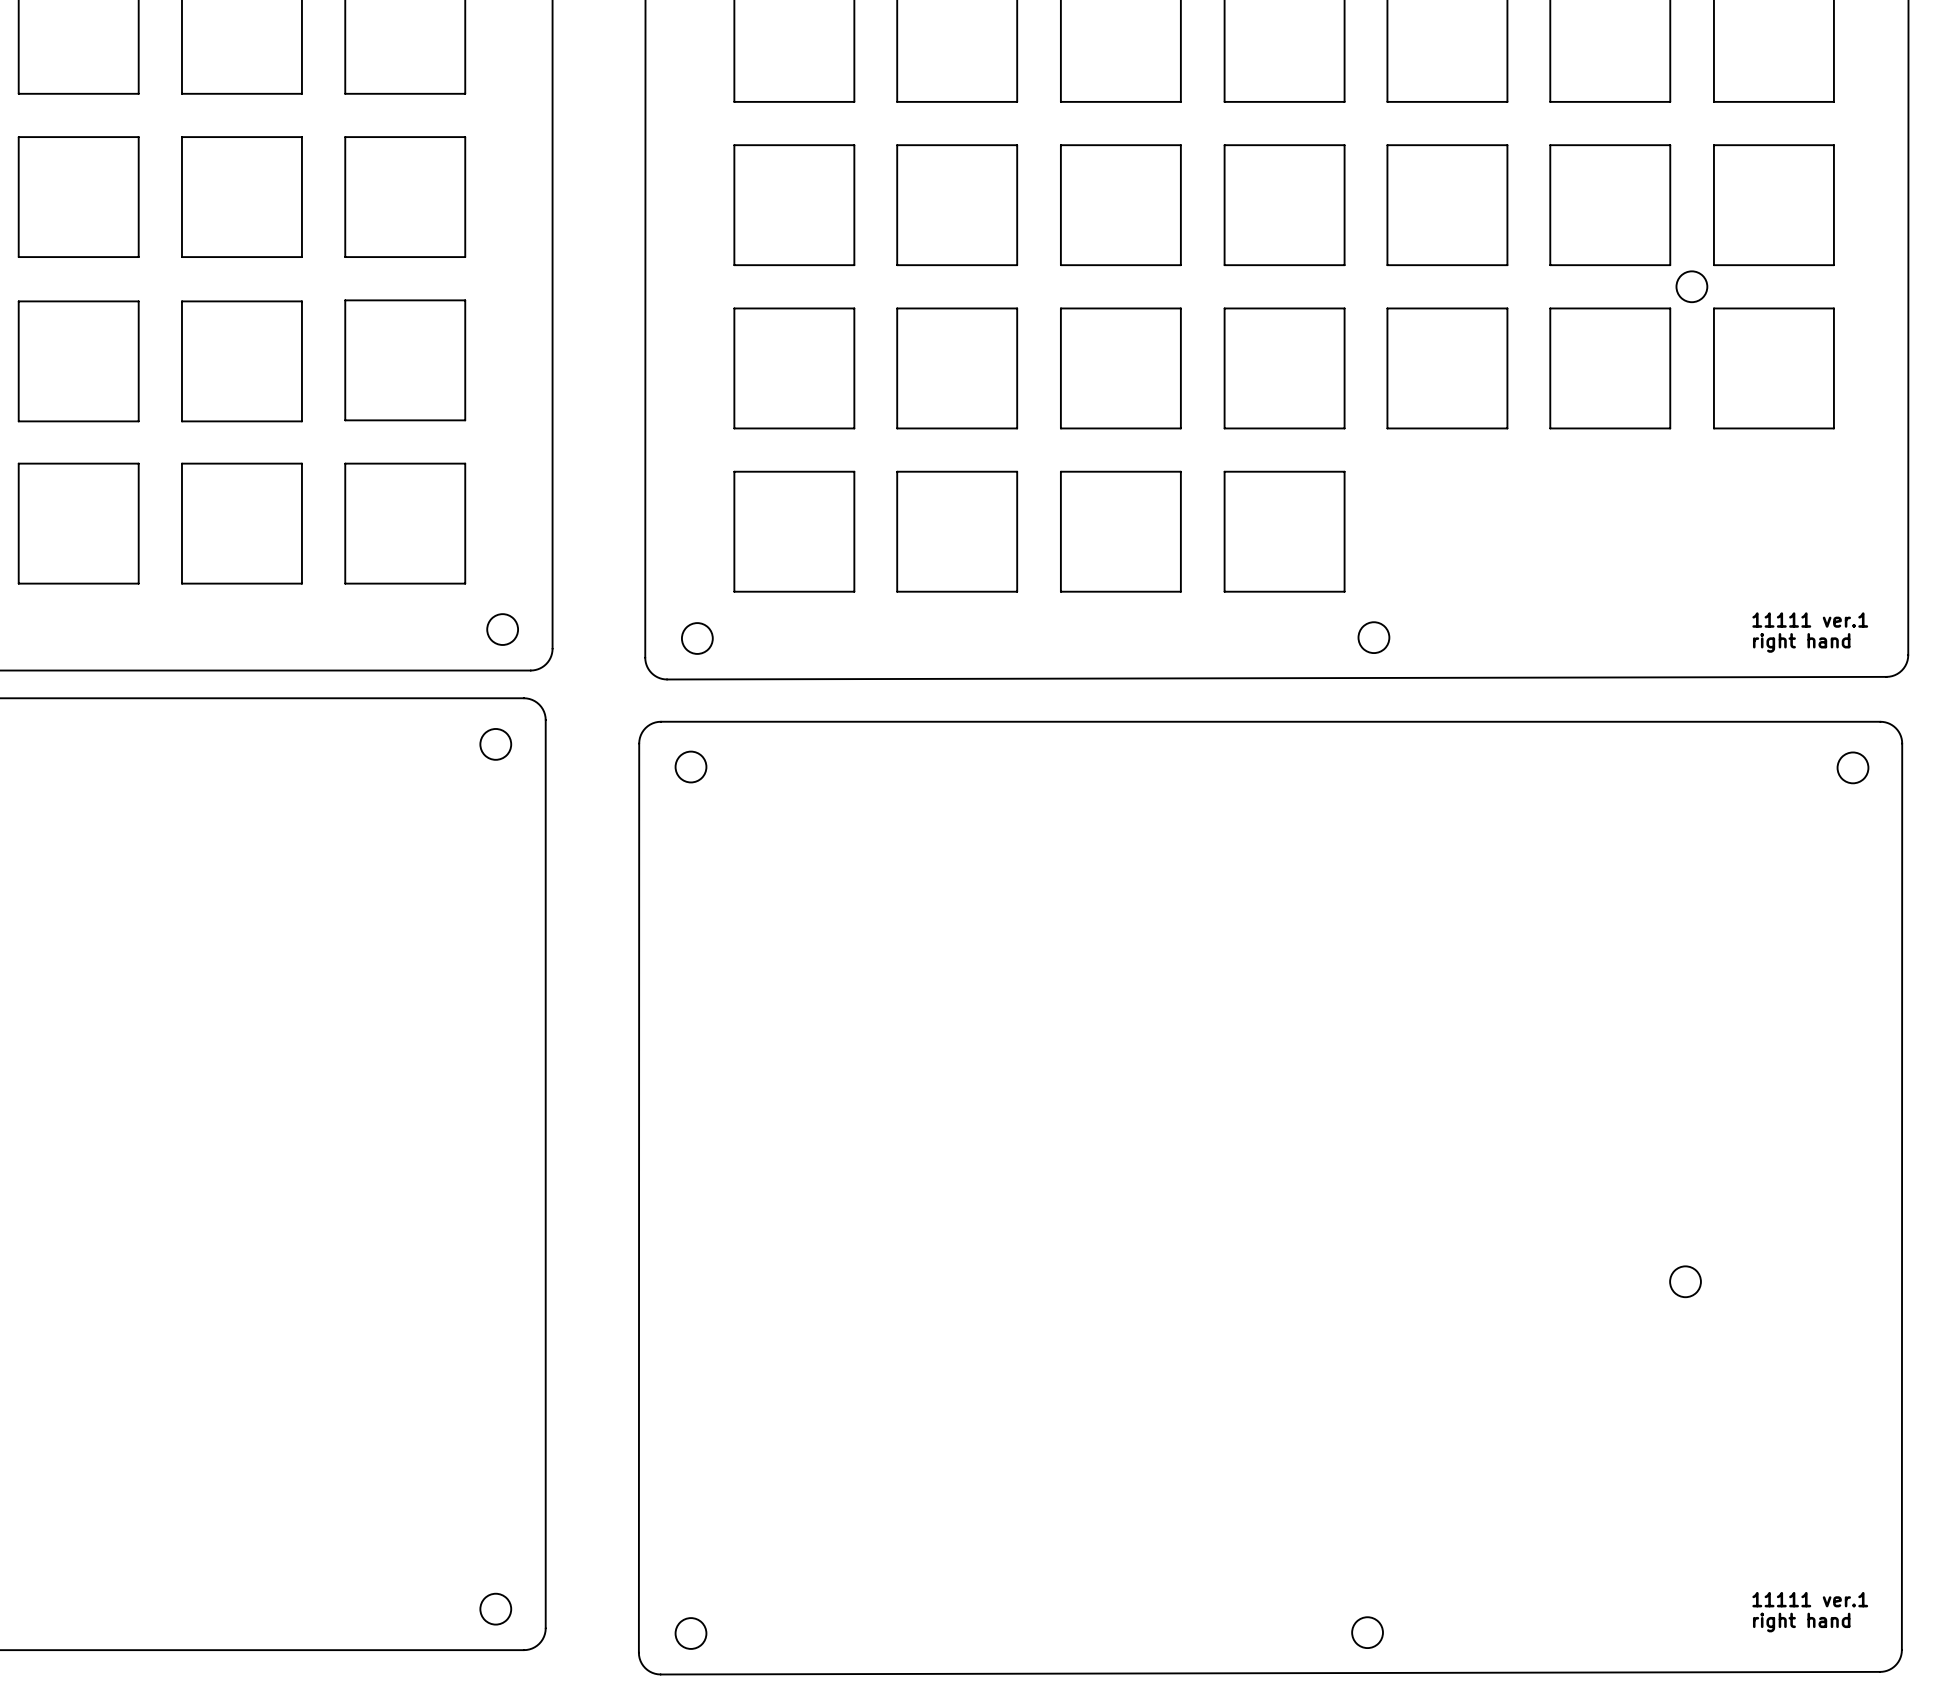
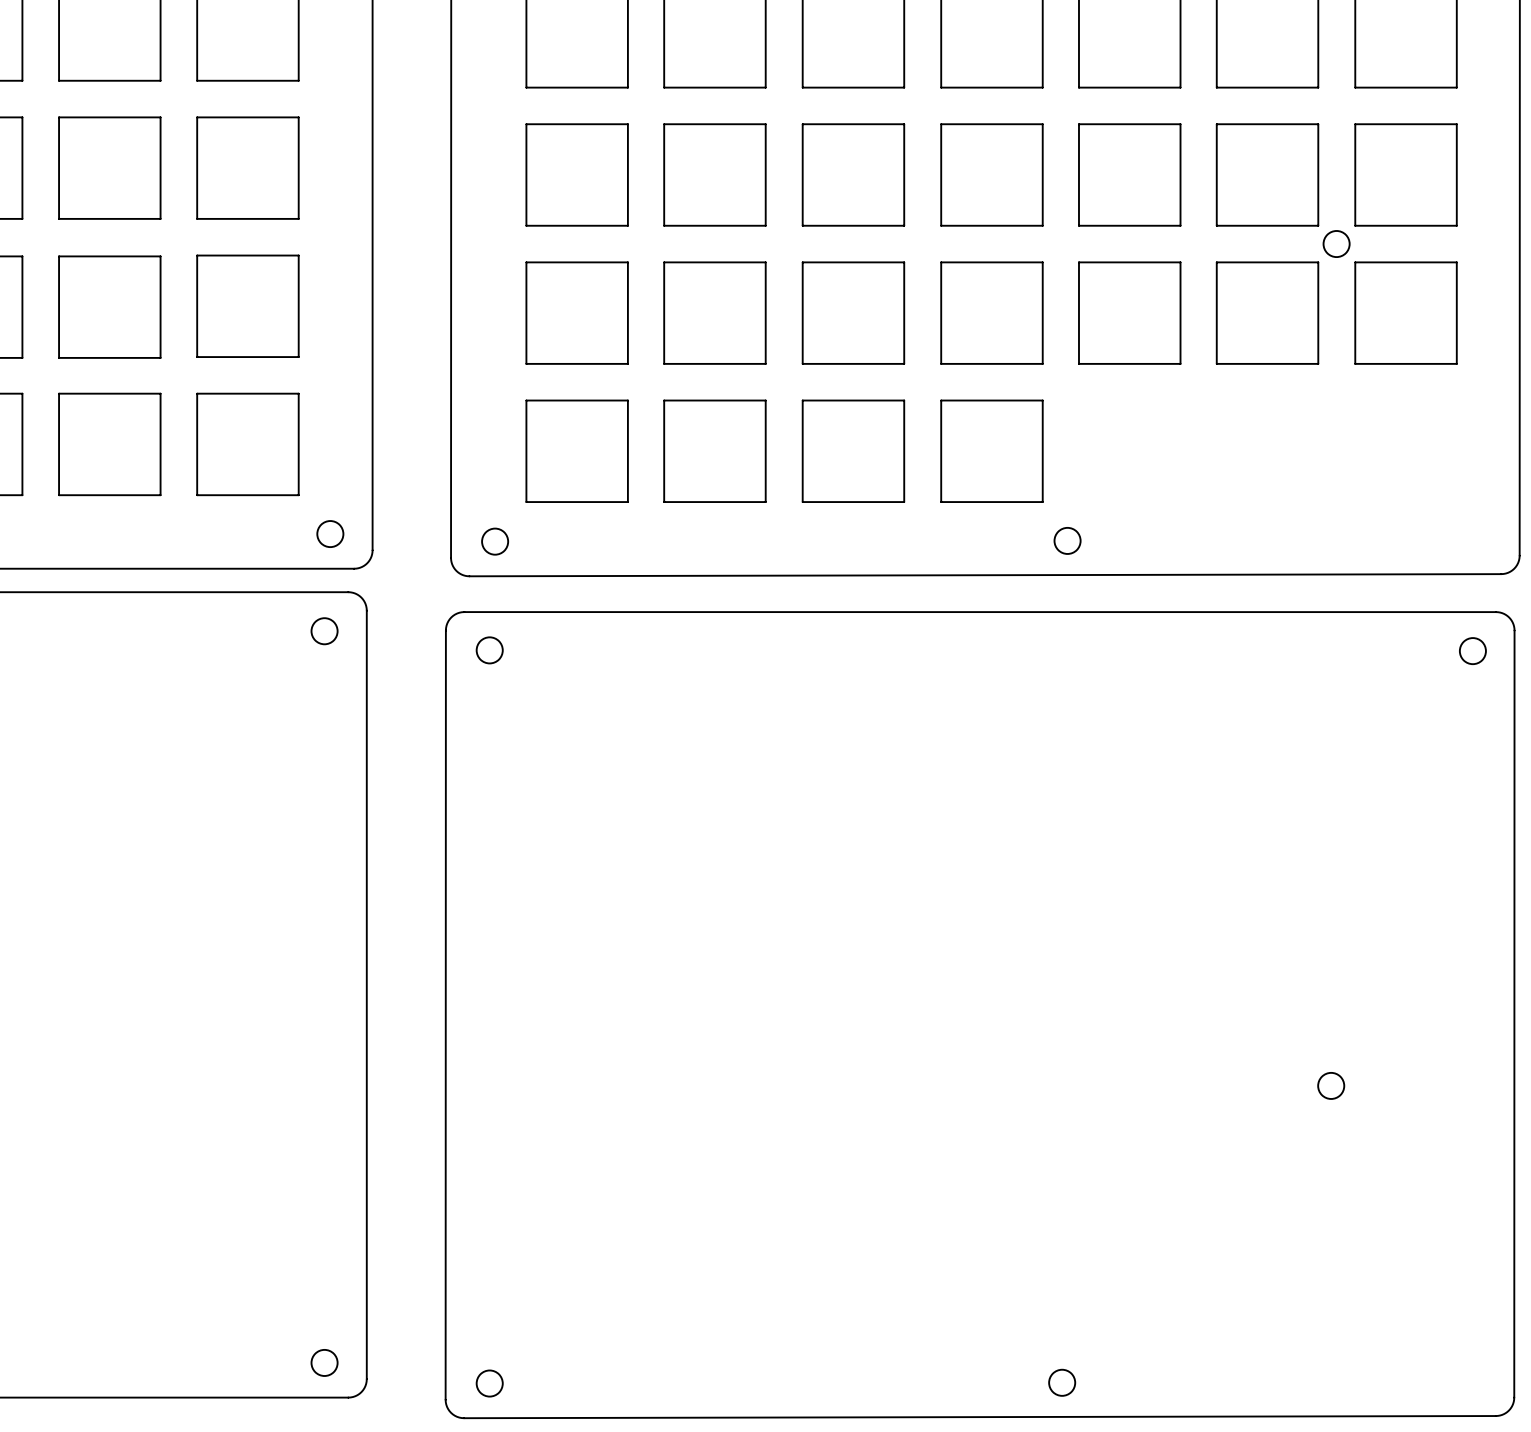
text: 11111 ver.1 (1810, 620) -> none
text: right hand (1801, 642) -> none
text: 11111 ver.1 (1810, 1599) -> none
text: right hand (1801, 1622) -> none

